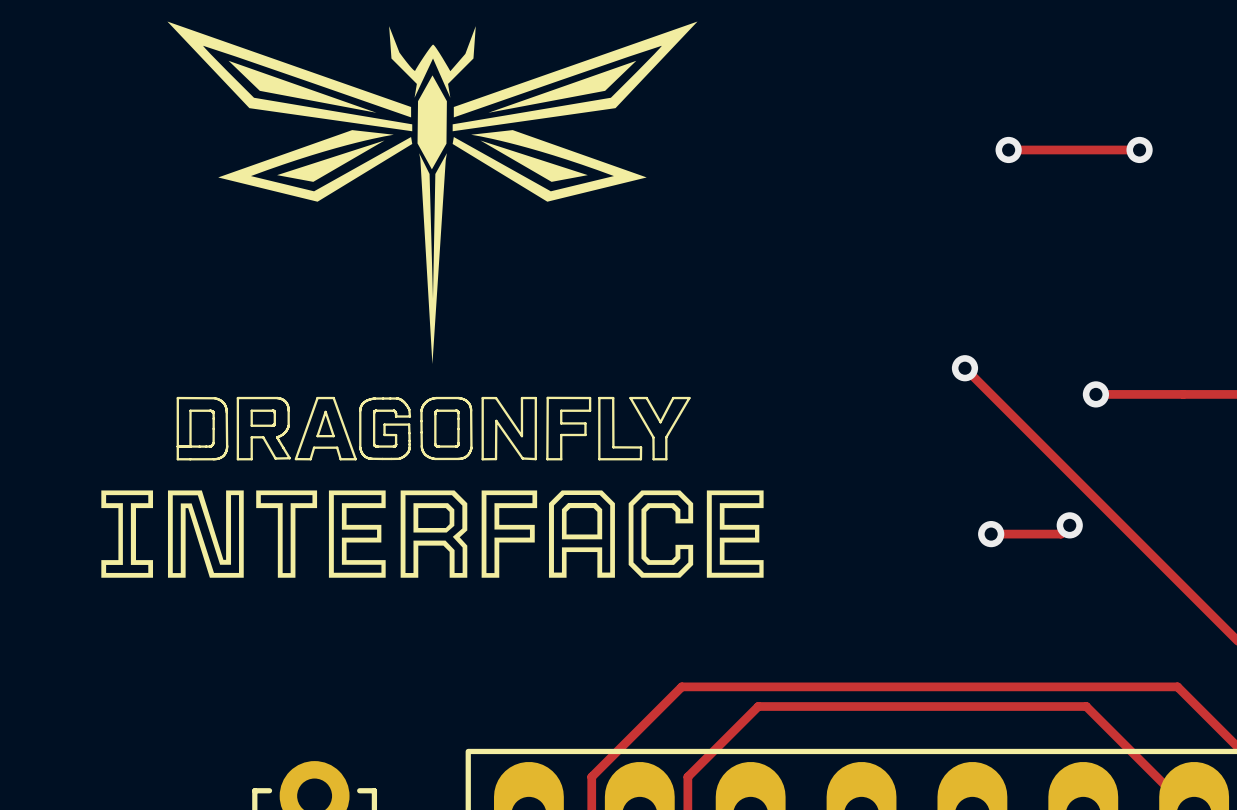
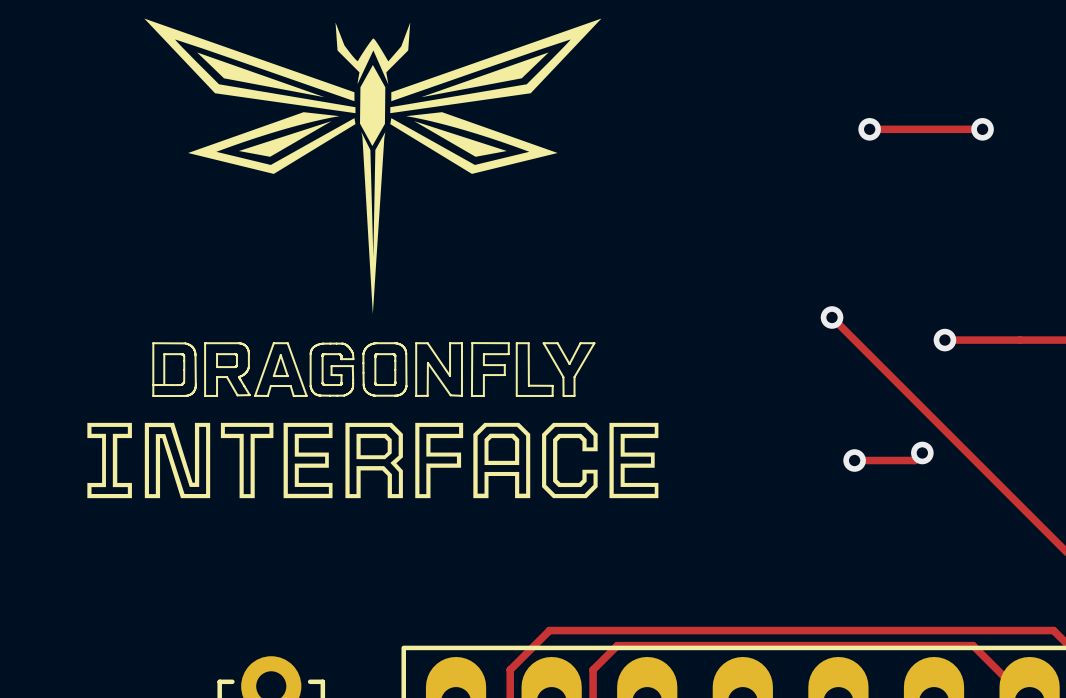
track: (637, 731) (681, 686) (1177, 686) (1221, 731) -> (549, 630) (1053, 630)
track: (716, 748) (758, 706) (1086, 706) (1128, 748) -> (617, 645) (973, 645)

